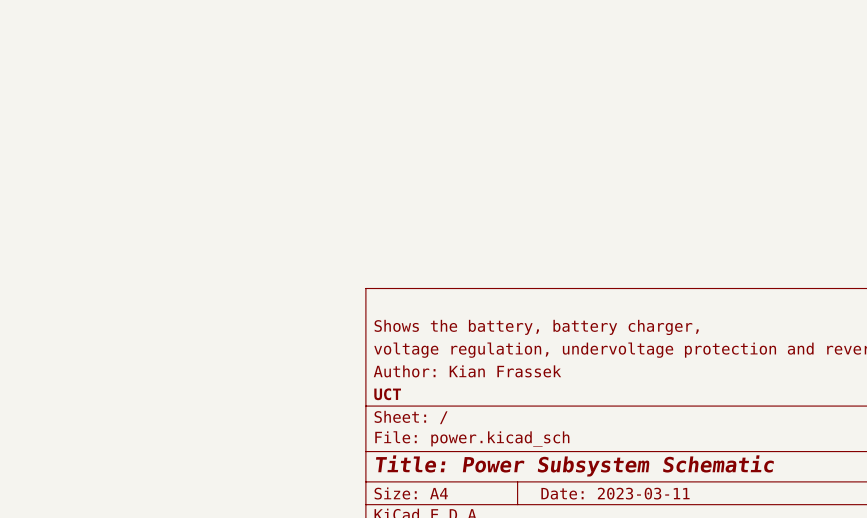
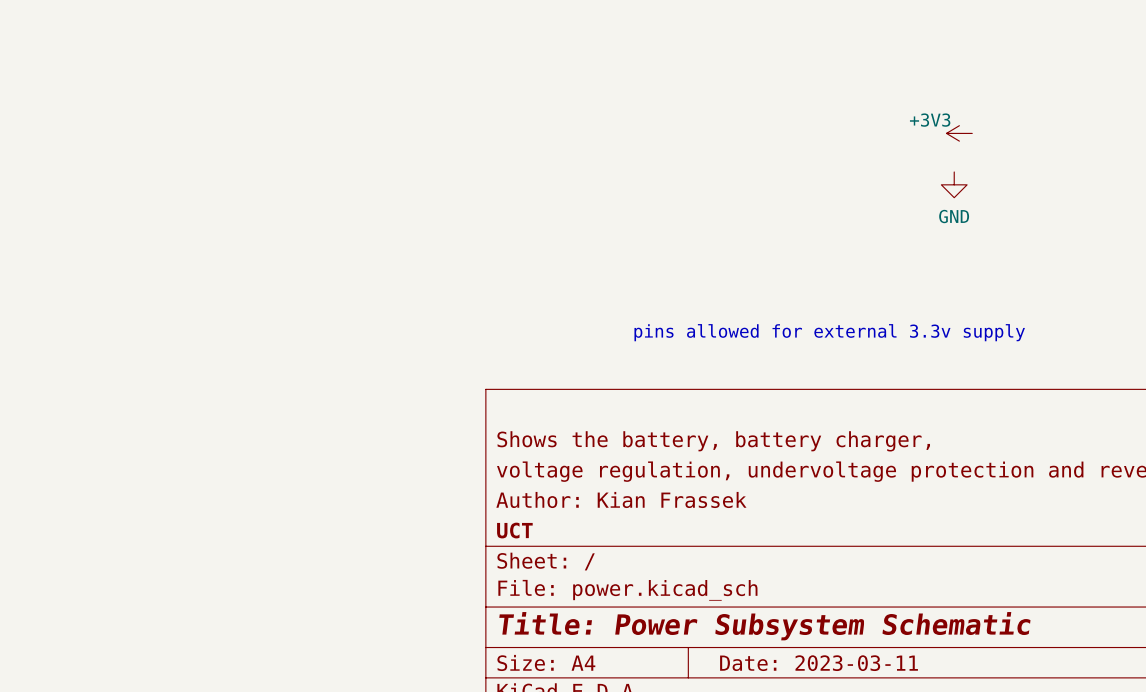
power symbol: none -> +3V3 (959, 133)
power symbol: none -> GND (954, 184)
text: none -> pins allowed for external 3.3v supply (829, 332)

